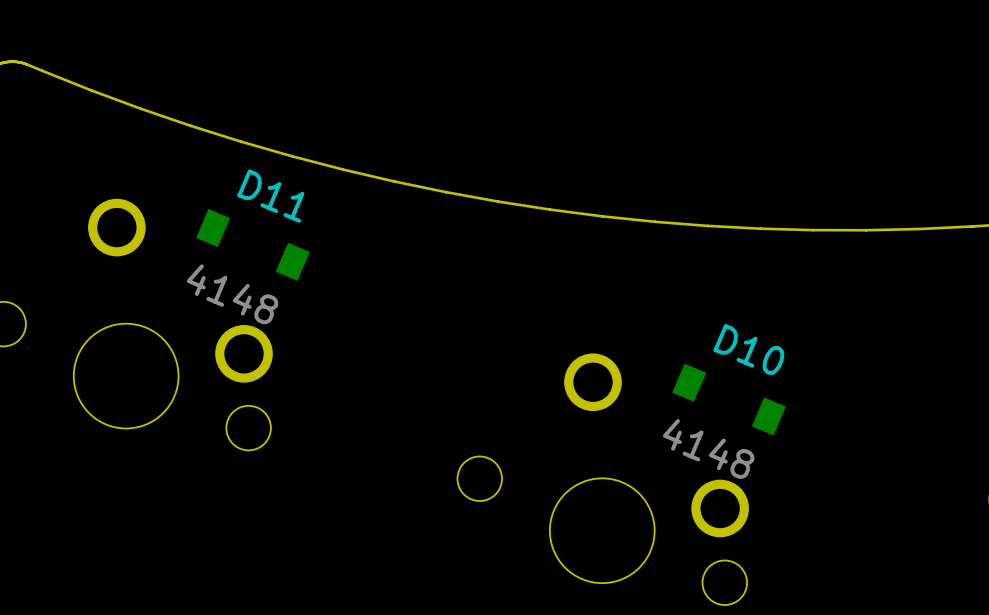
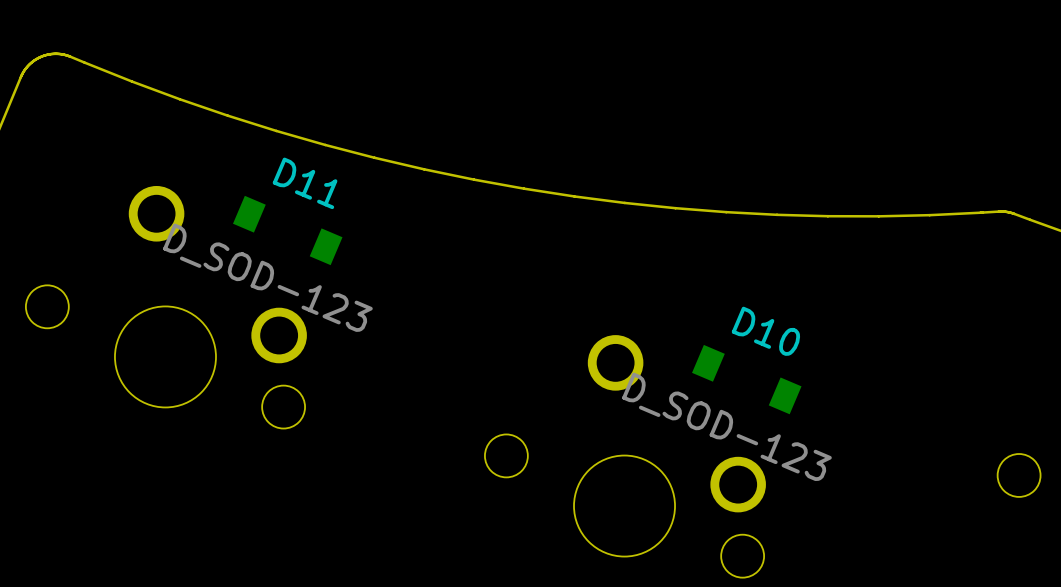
D11 value: 4148 (232, 294) -> D_SOD-123 (267, 277)
D10 value: 4148 (708, 449) -> D_SOD-123 (726, 426)

